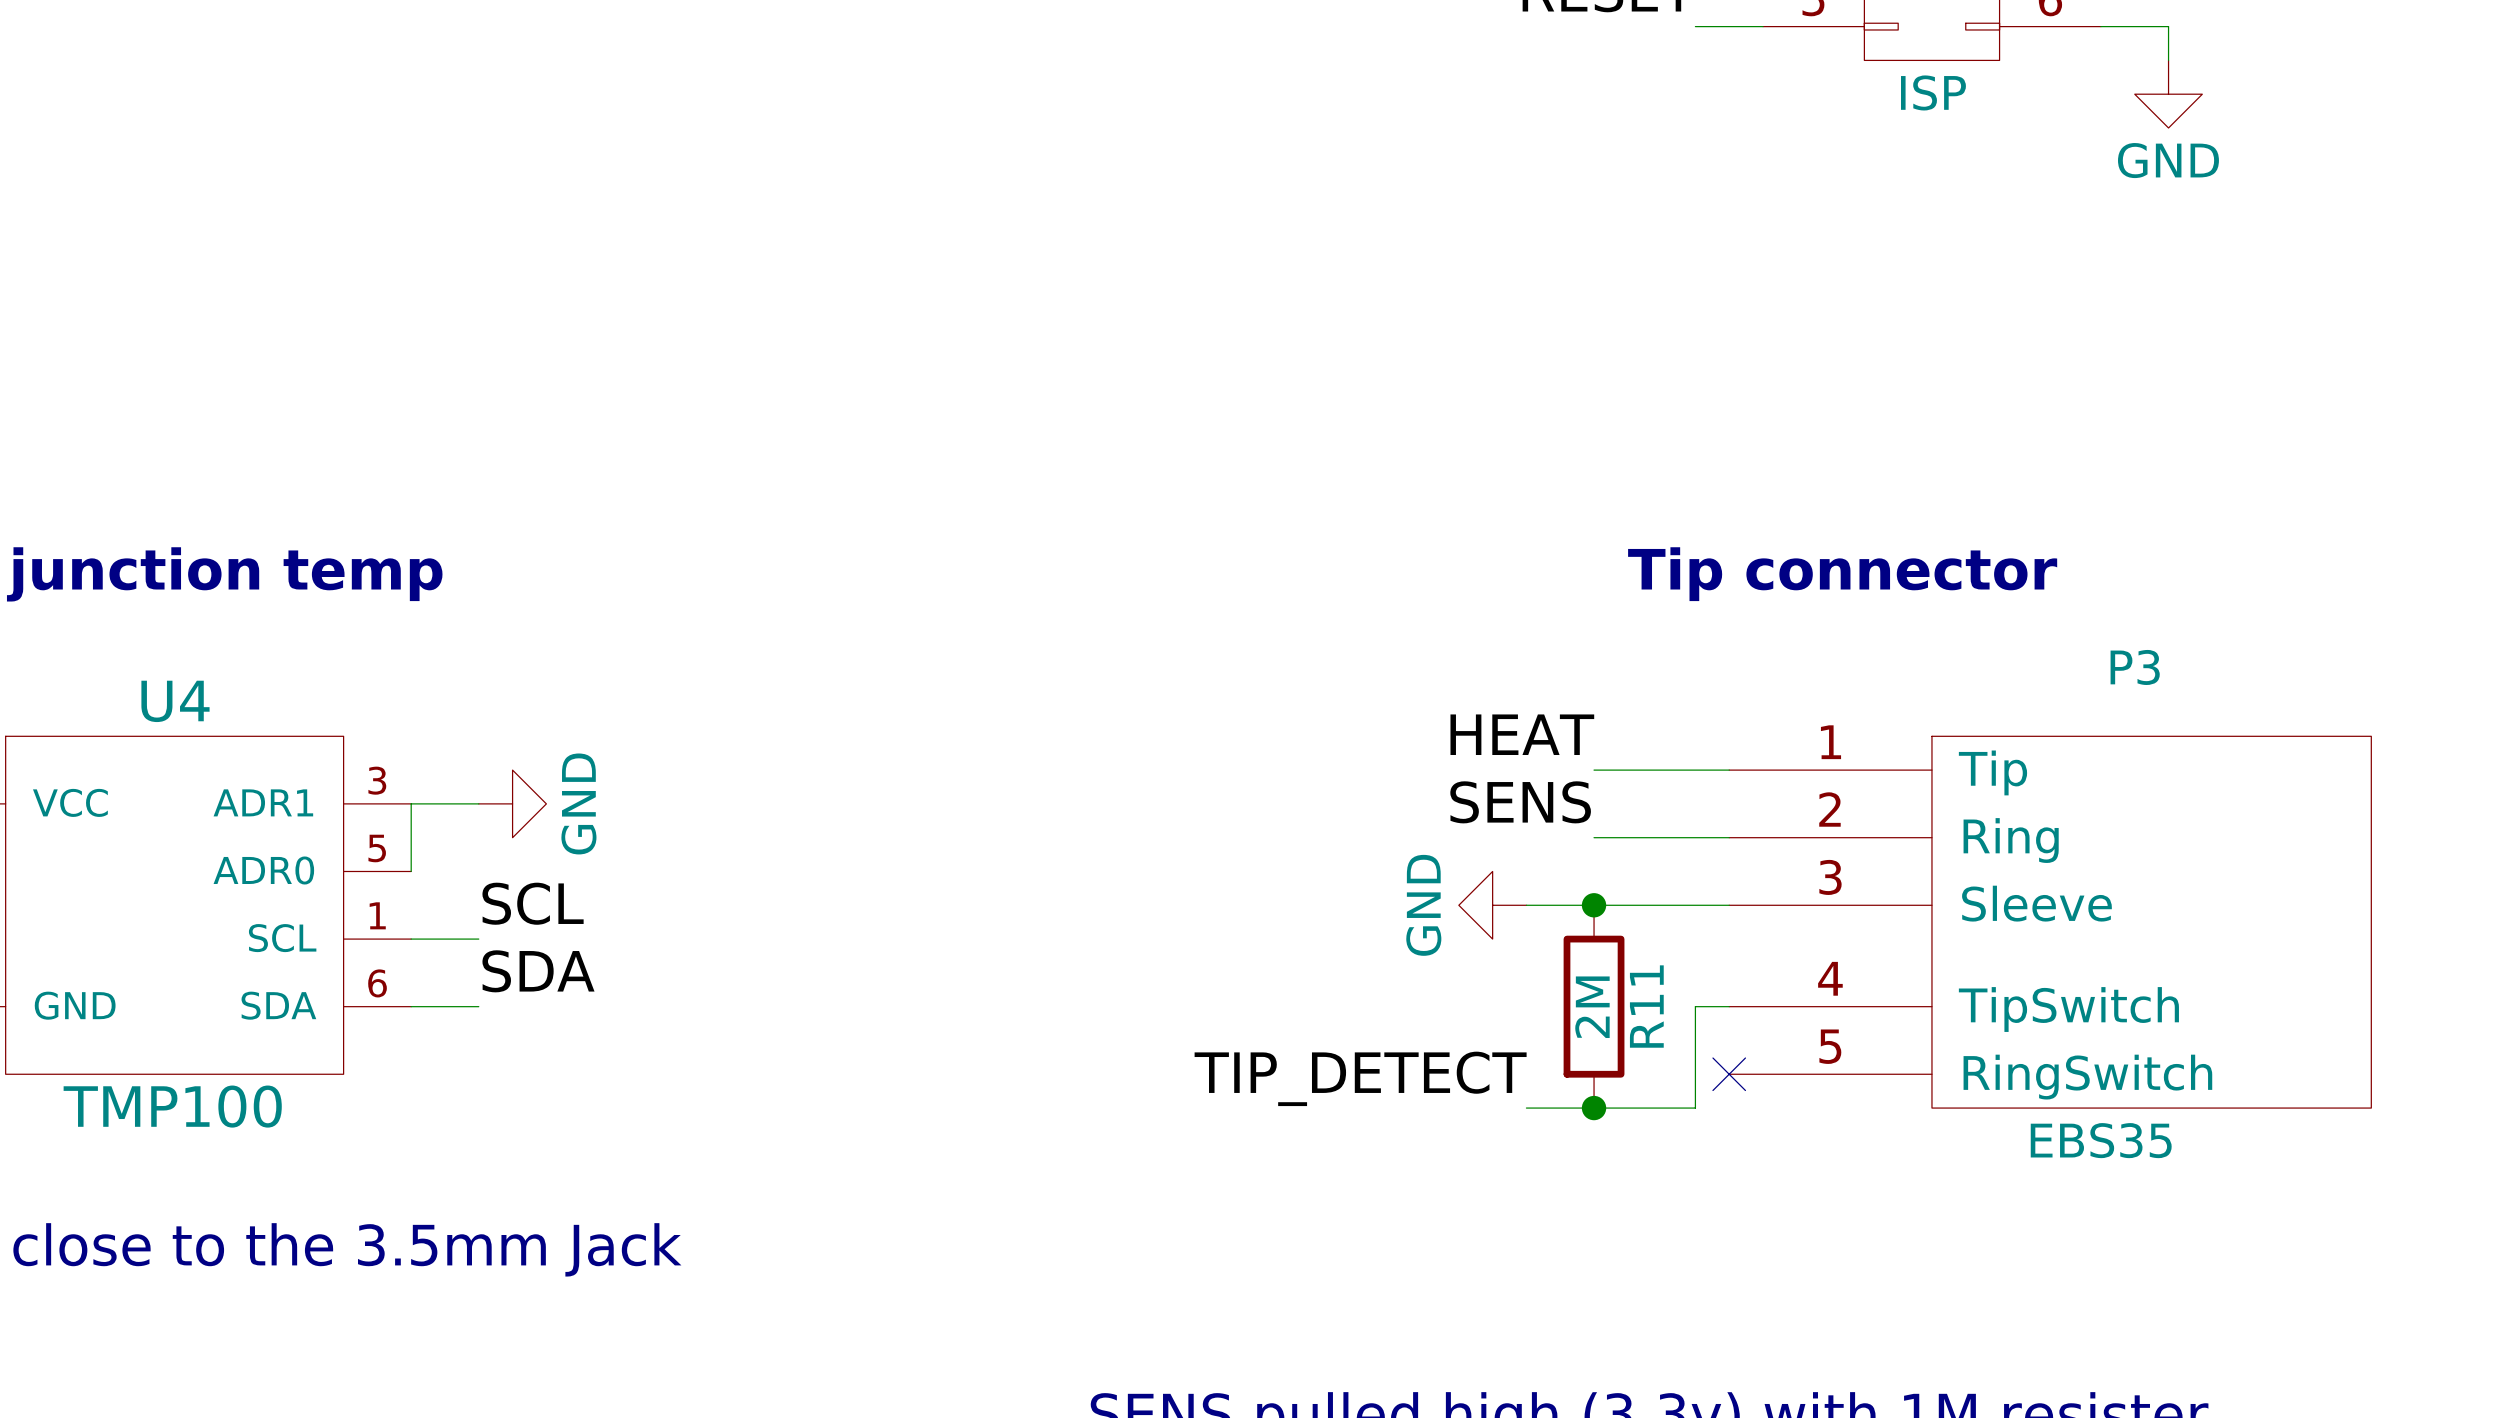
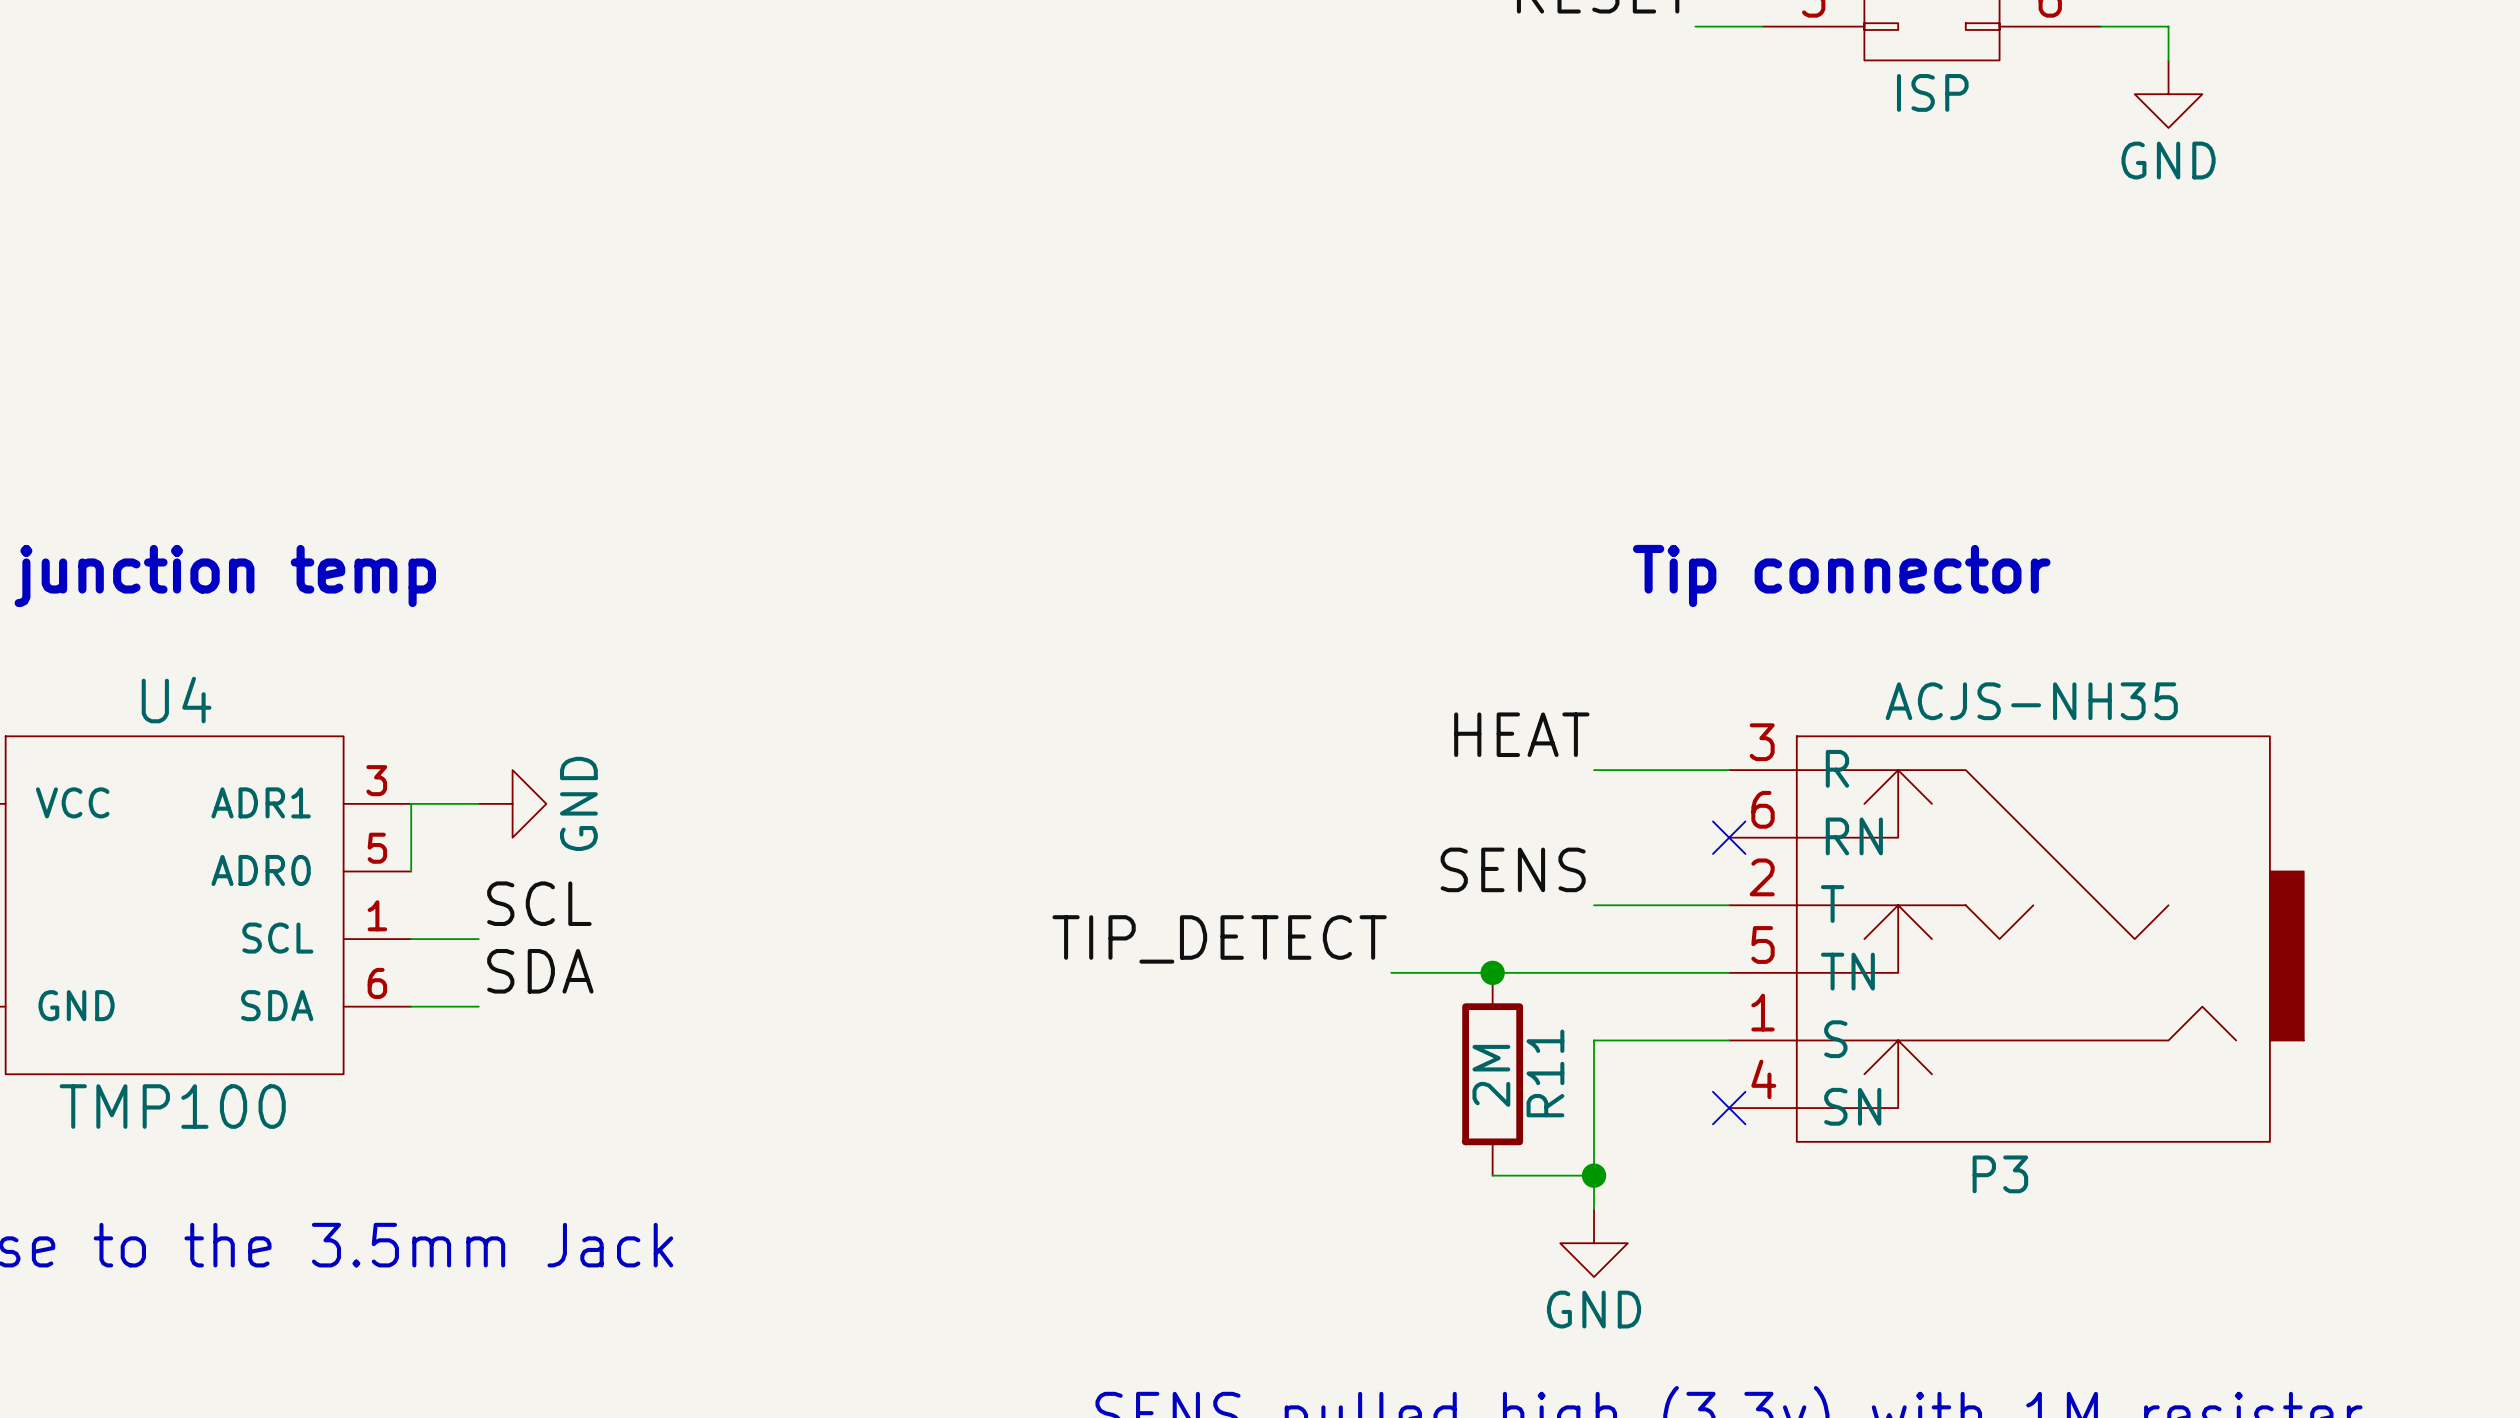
P3 name position: P3 (2135, 667) -> P3 (2000, 1174)
P3 symbol: [1729, 736, 2372, 1109] -> [1729, 736, 2304, 1142]
label position: SENS (1520, 802) -> SENS (1513, 869)
wire: (1594, 837) (1729, 837) -> none
no-connect mark: none -> (1729, 837)
power symbol rotation: 0° (1492, 905) -> 90° counterclockwise (1594, 1243)
power symbol position: GND (1492, 905) -> GND (1594, 1243)
wire: (1526, 905) (1594, 905) -> none
junction: (1594, 905) -> none
wire: none -> (1391, 972) (1729, 972)
junction: none -> (1492, 972)
R11 position: (1594, 1006) -> (1492, 1074)
wire: (1729, 1006) (1695, 1006) (1695, 1108) (1526, 1108) -> none
wire: none -> (1729, 1040) (1594, 1040) (1594, 1209)
no-connect mark position: (1729, 1074) -> (1729, 1108)
label position: TIP_DETECT (1360, 1078) -> TIP_DETECT (1219, 939)
junction position: (1594, 1108) -> (1594, 1175)
P3 value: EBS35 (2101, 1140) -> ACJS-NH35 (2031, 701)
wire: none -> (1492, 1175) (1594, 1175)

